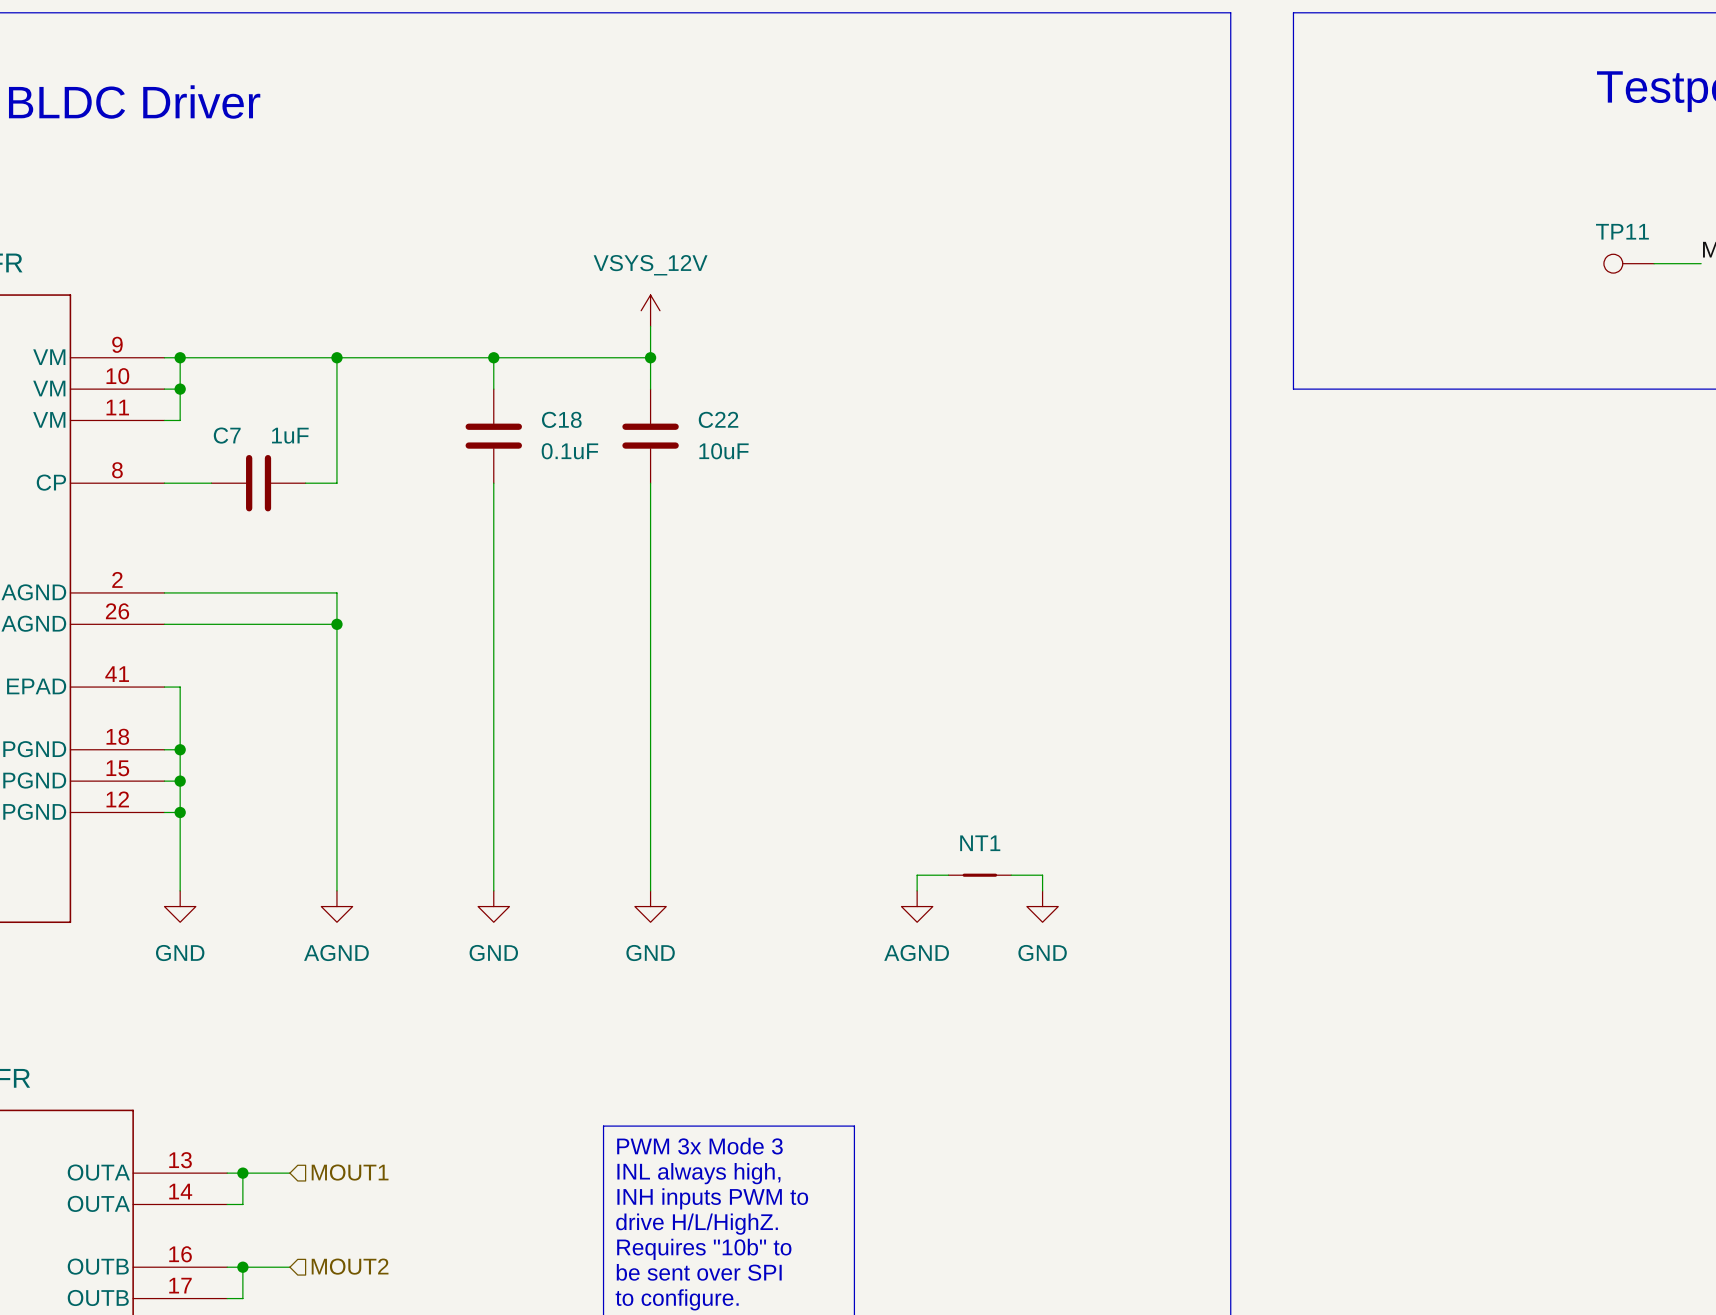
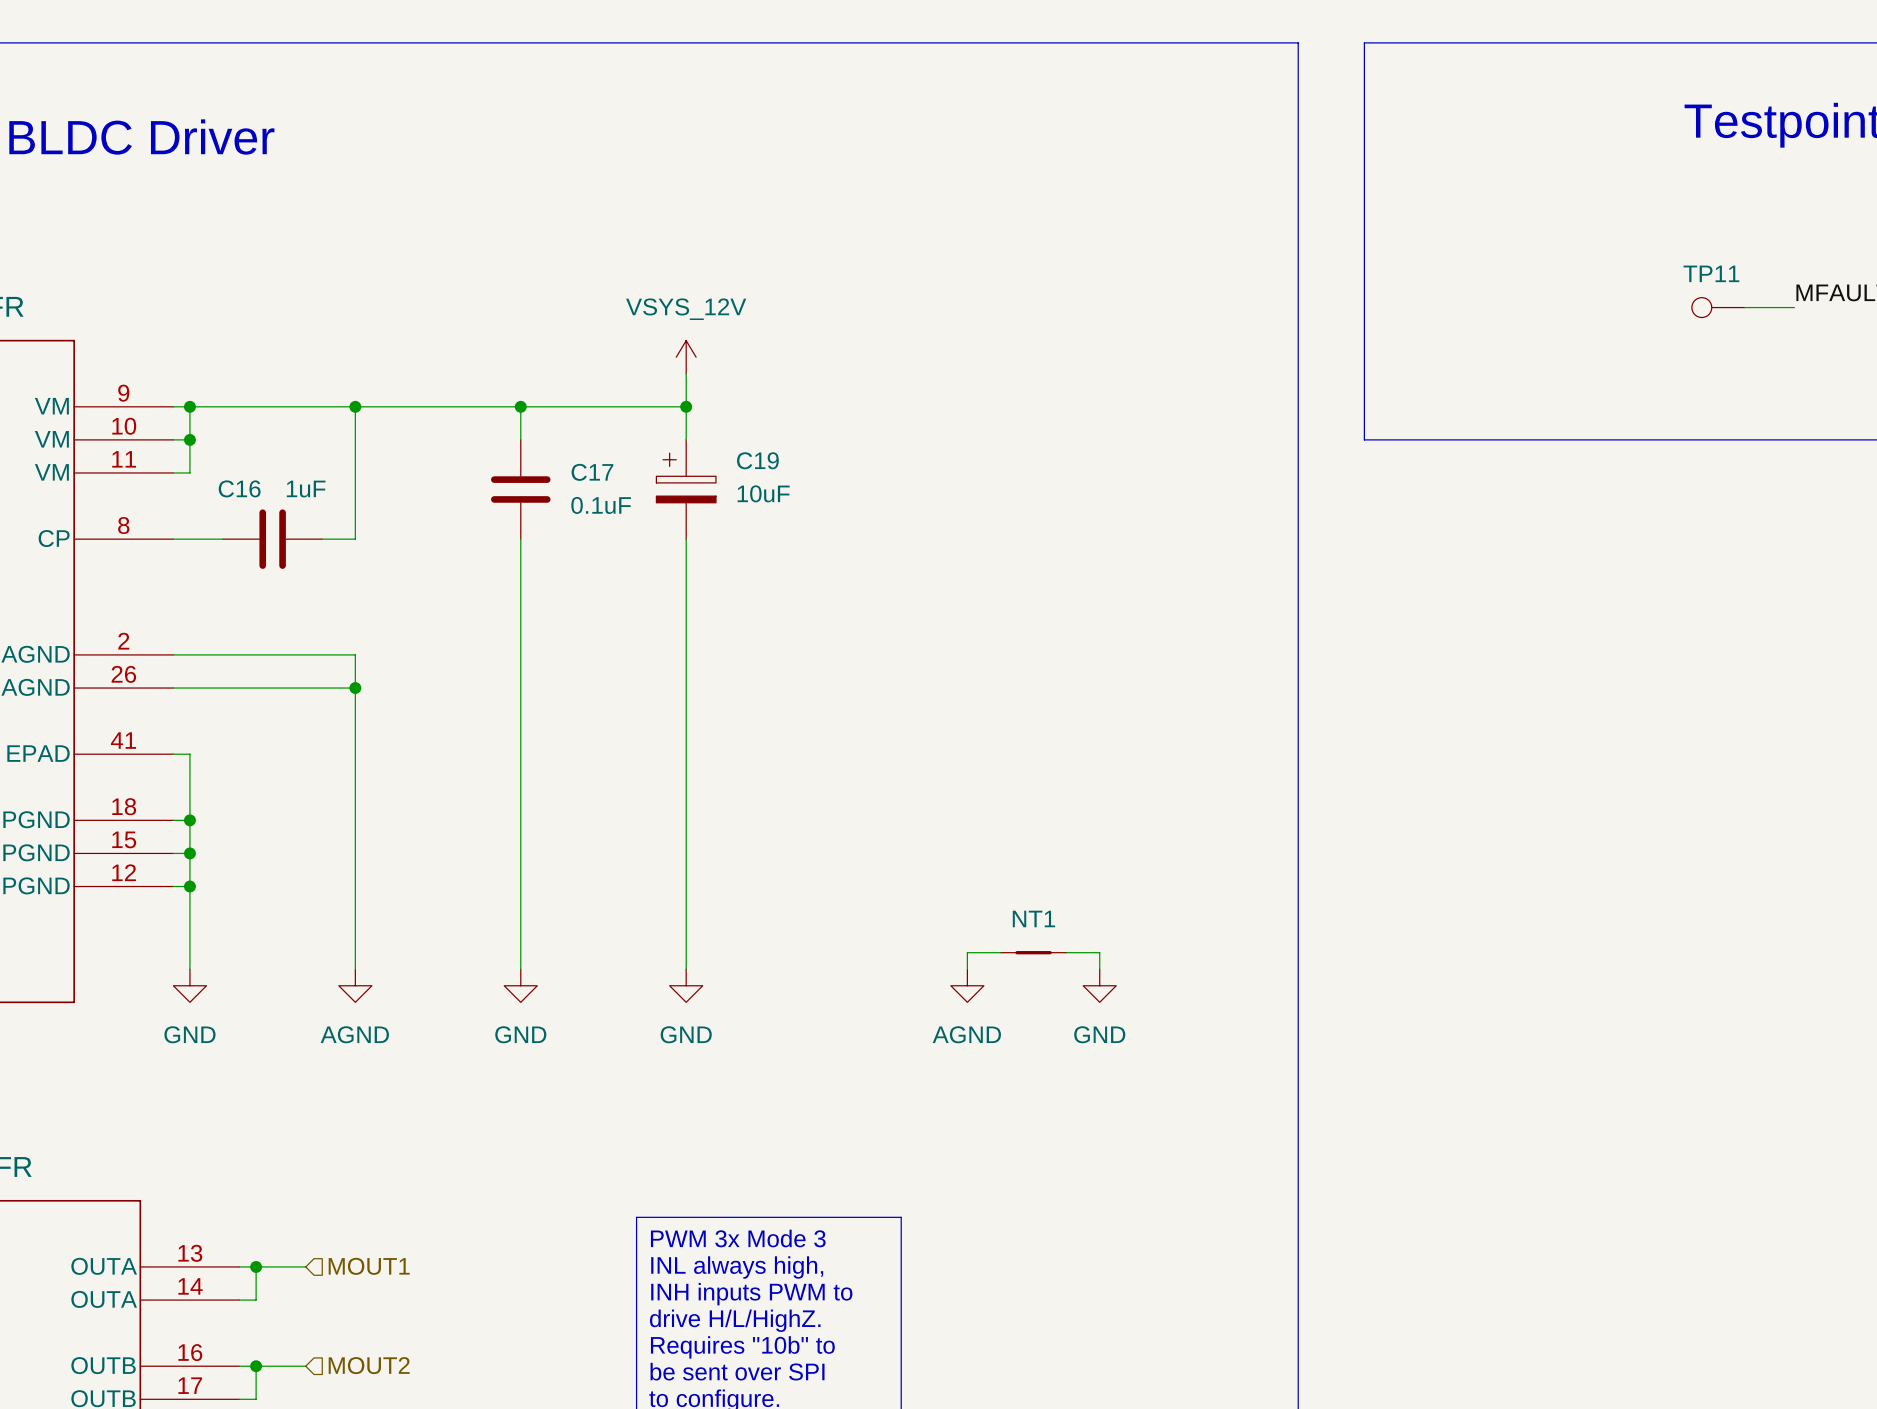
C18 name: C18 (561, 419) -> C17 (592, 472)
C7 name: C7 (227, 435) -> C16 (239, 488)
C22: 10uF (650, 436) -> none
C19: none -> 10uF (686, 489)

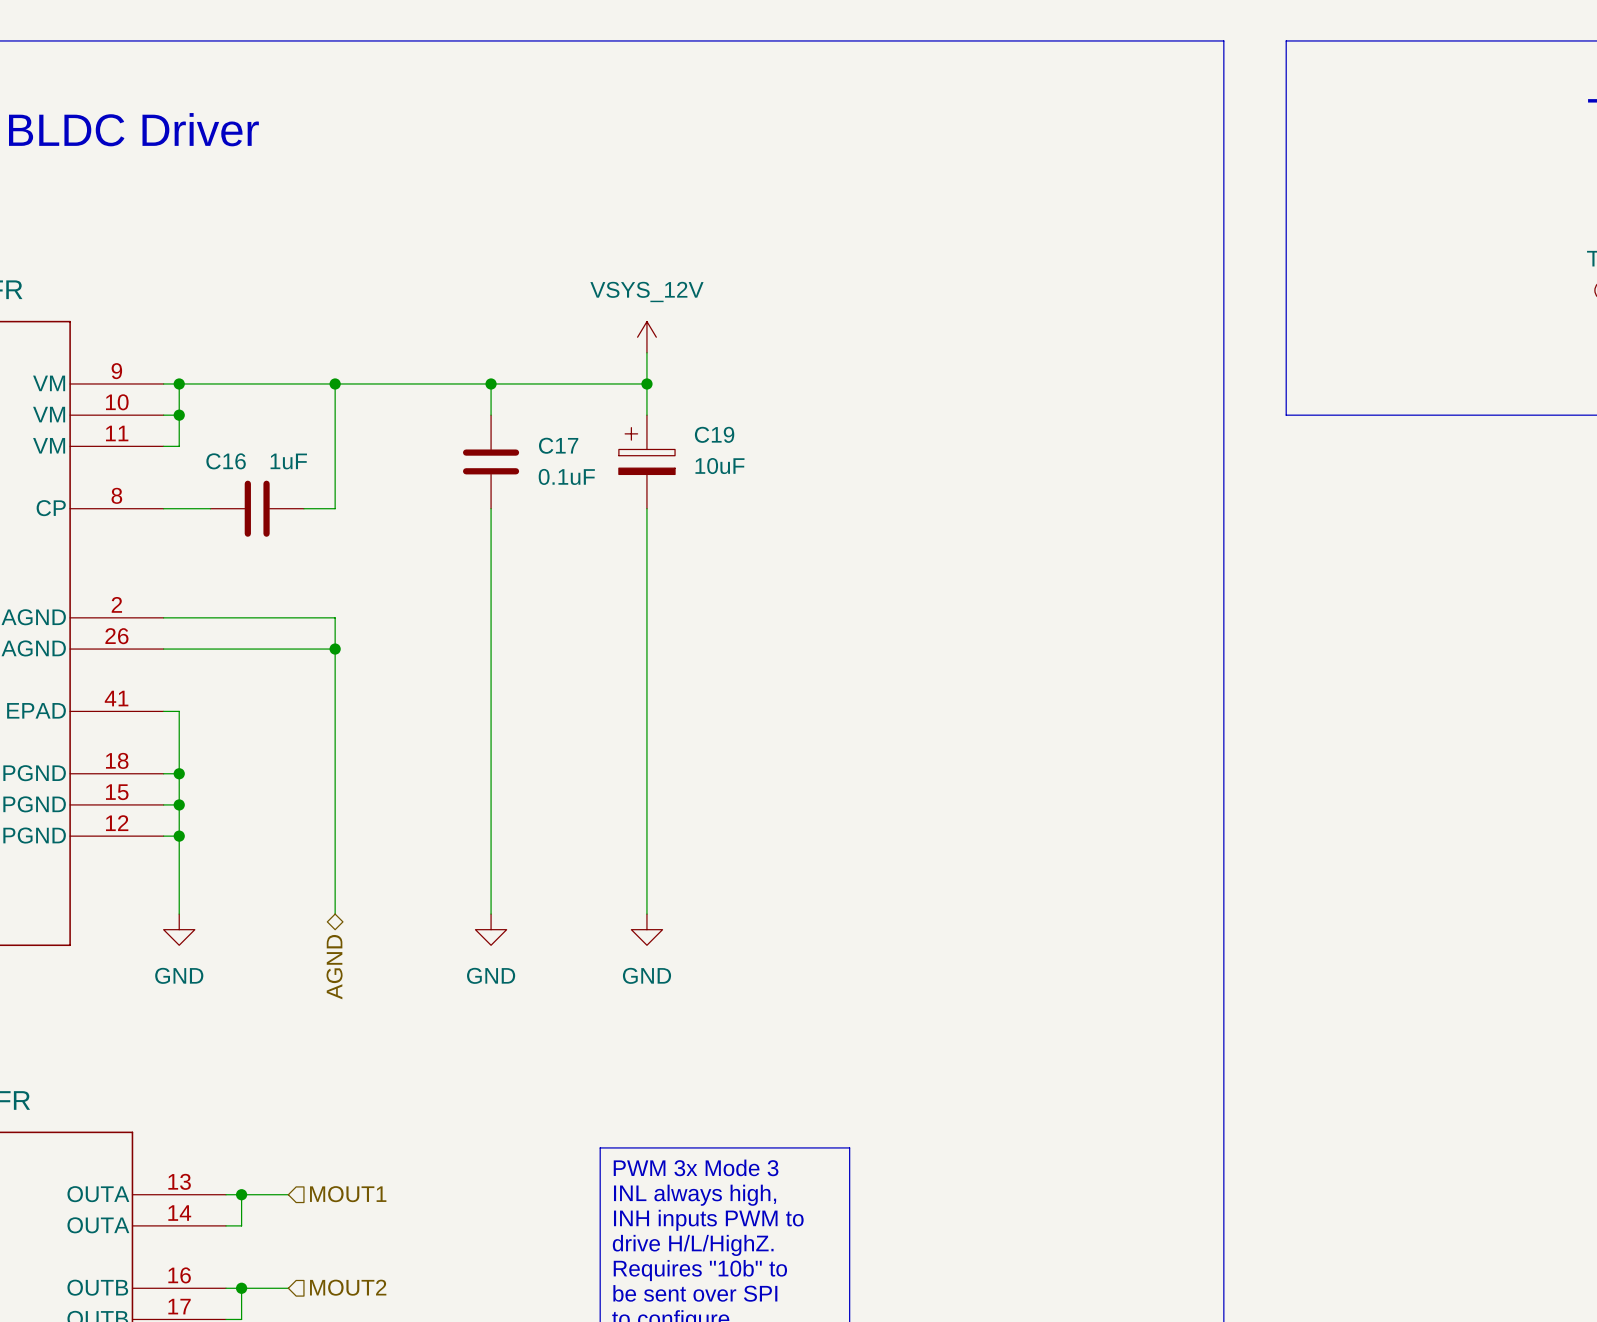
wire: (1000, 952) (967, 952) (967, 969) -> none
NT1: (1033, 952) -> none
wire: (1066, 952) (1099, 952) (1099, 969) -> none
power symbol: AGND (355, 985) -> none
power symbol: AGND (967, 985) -> none
power symbol: GND (1099, 985) -> none
hierarchical label: none -> AGND (334, 967)

